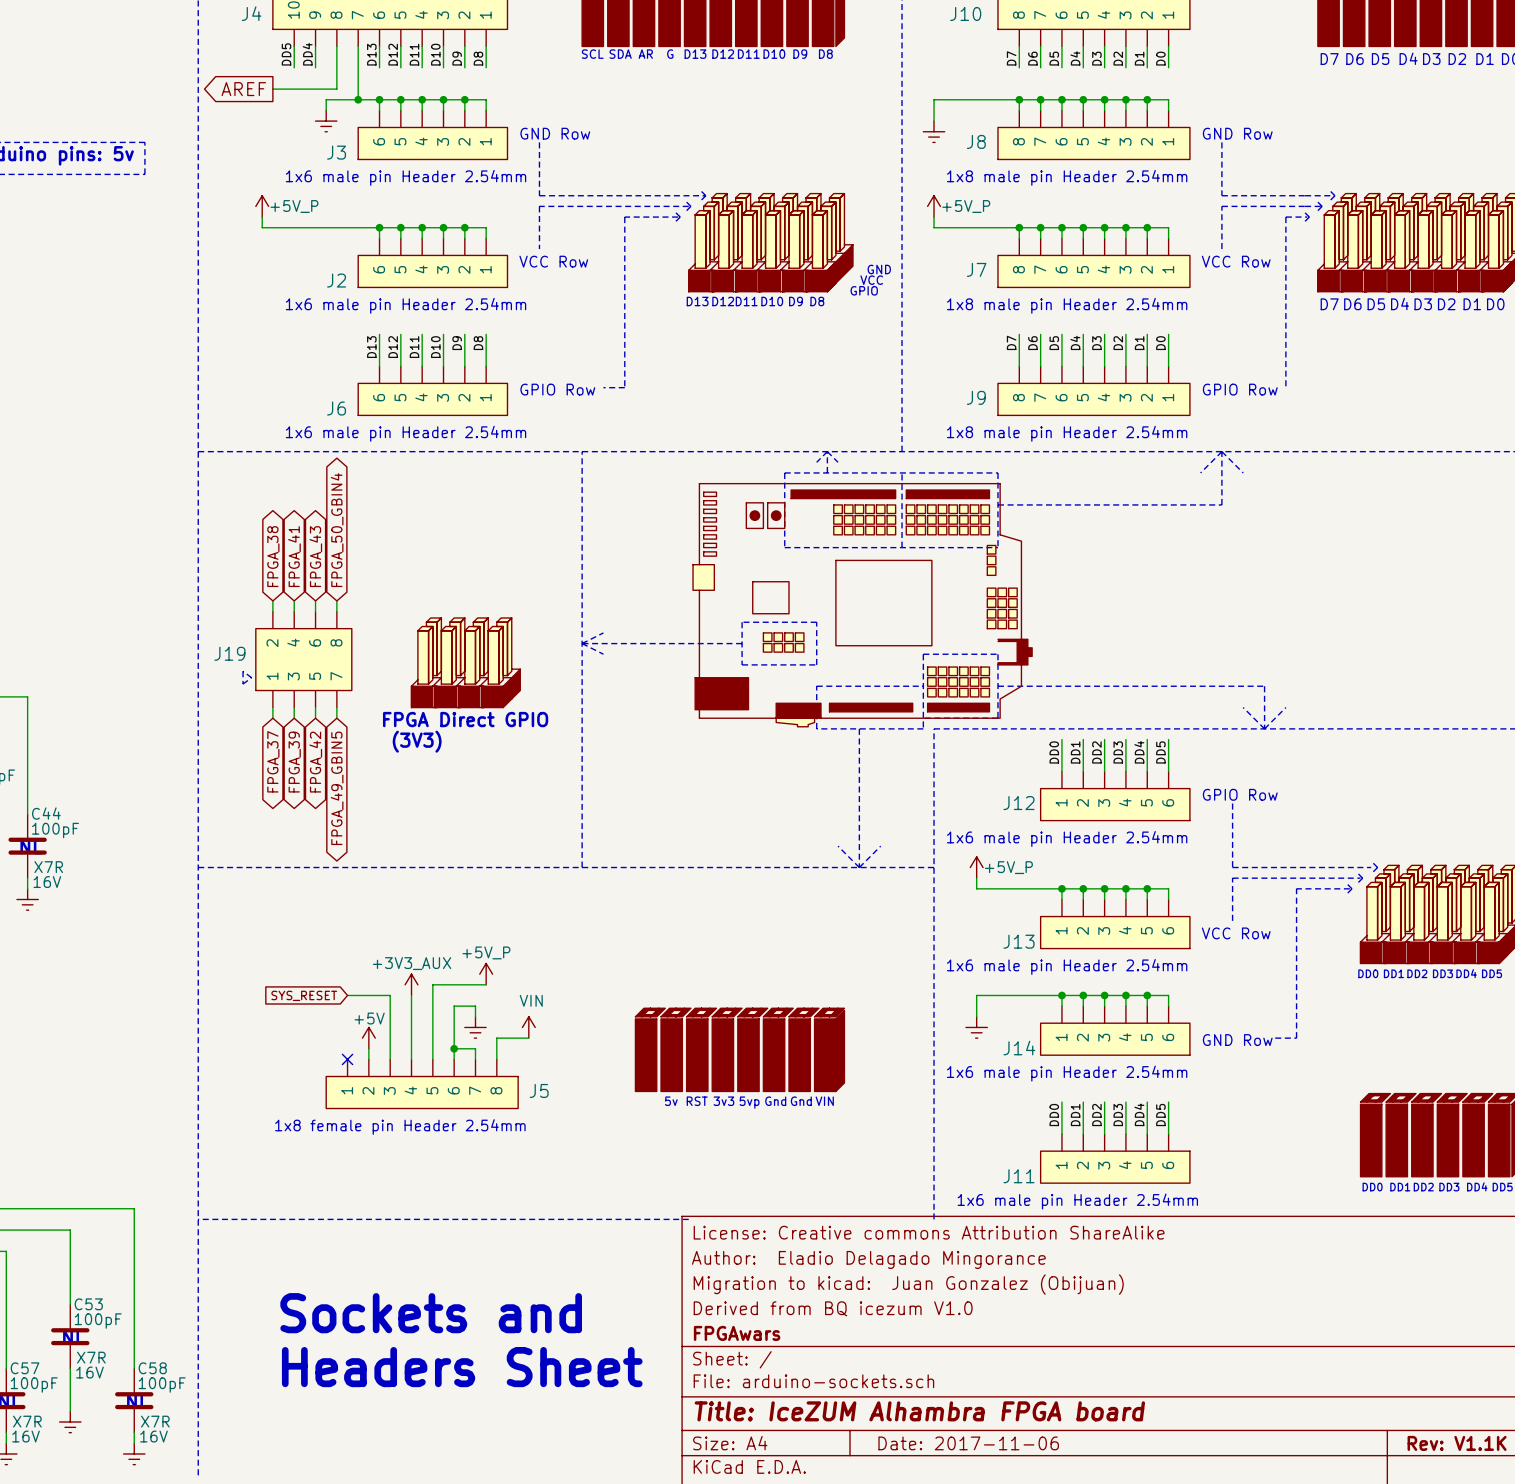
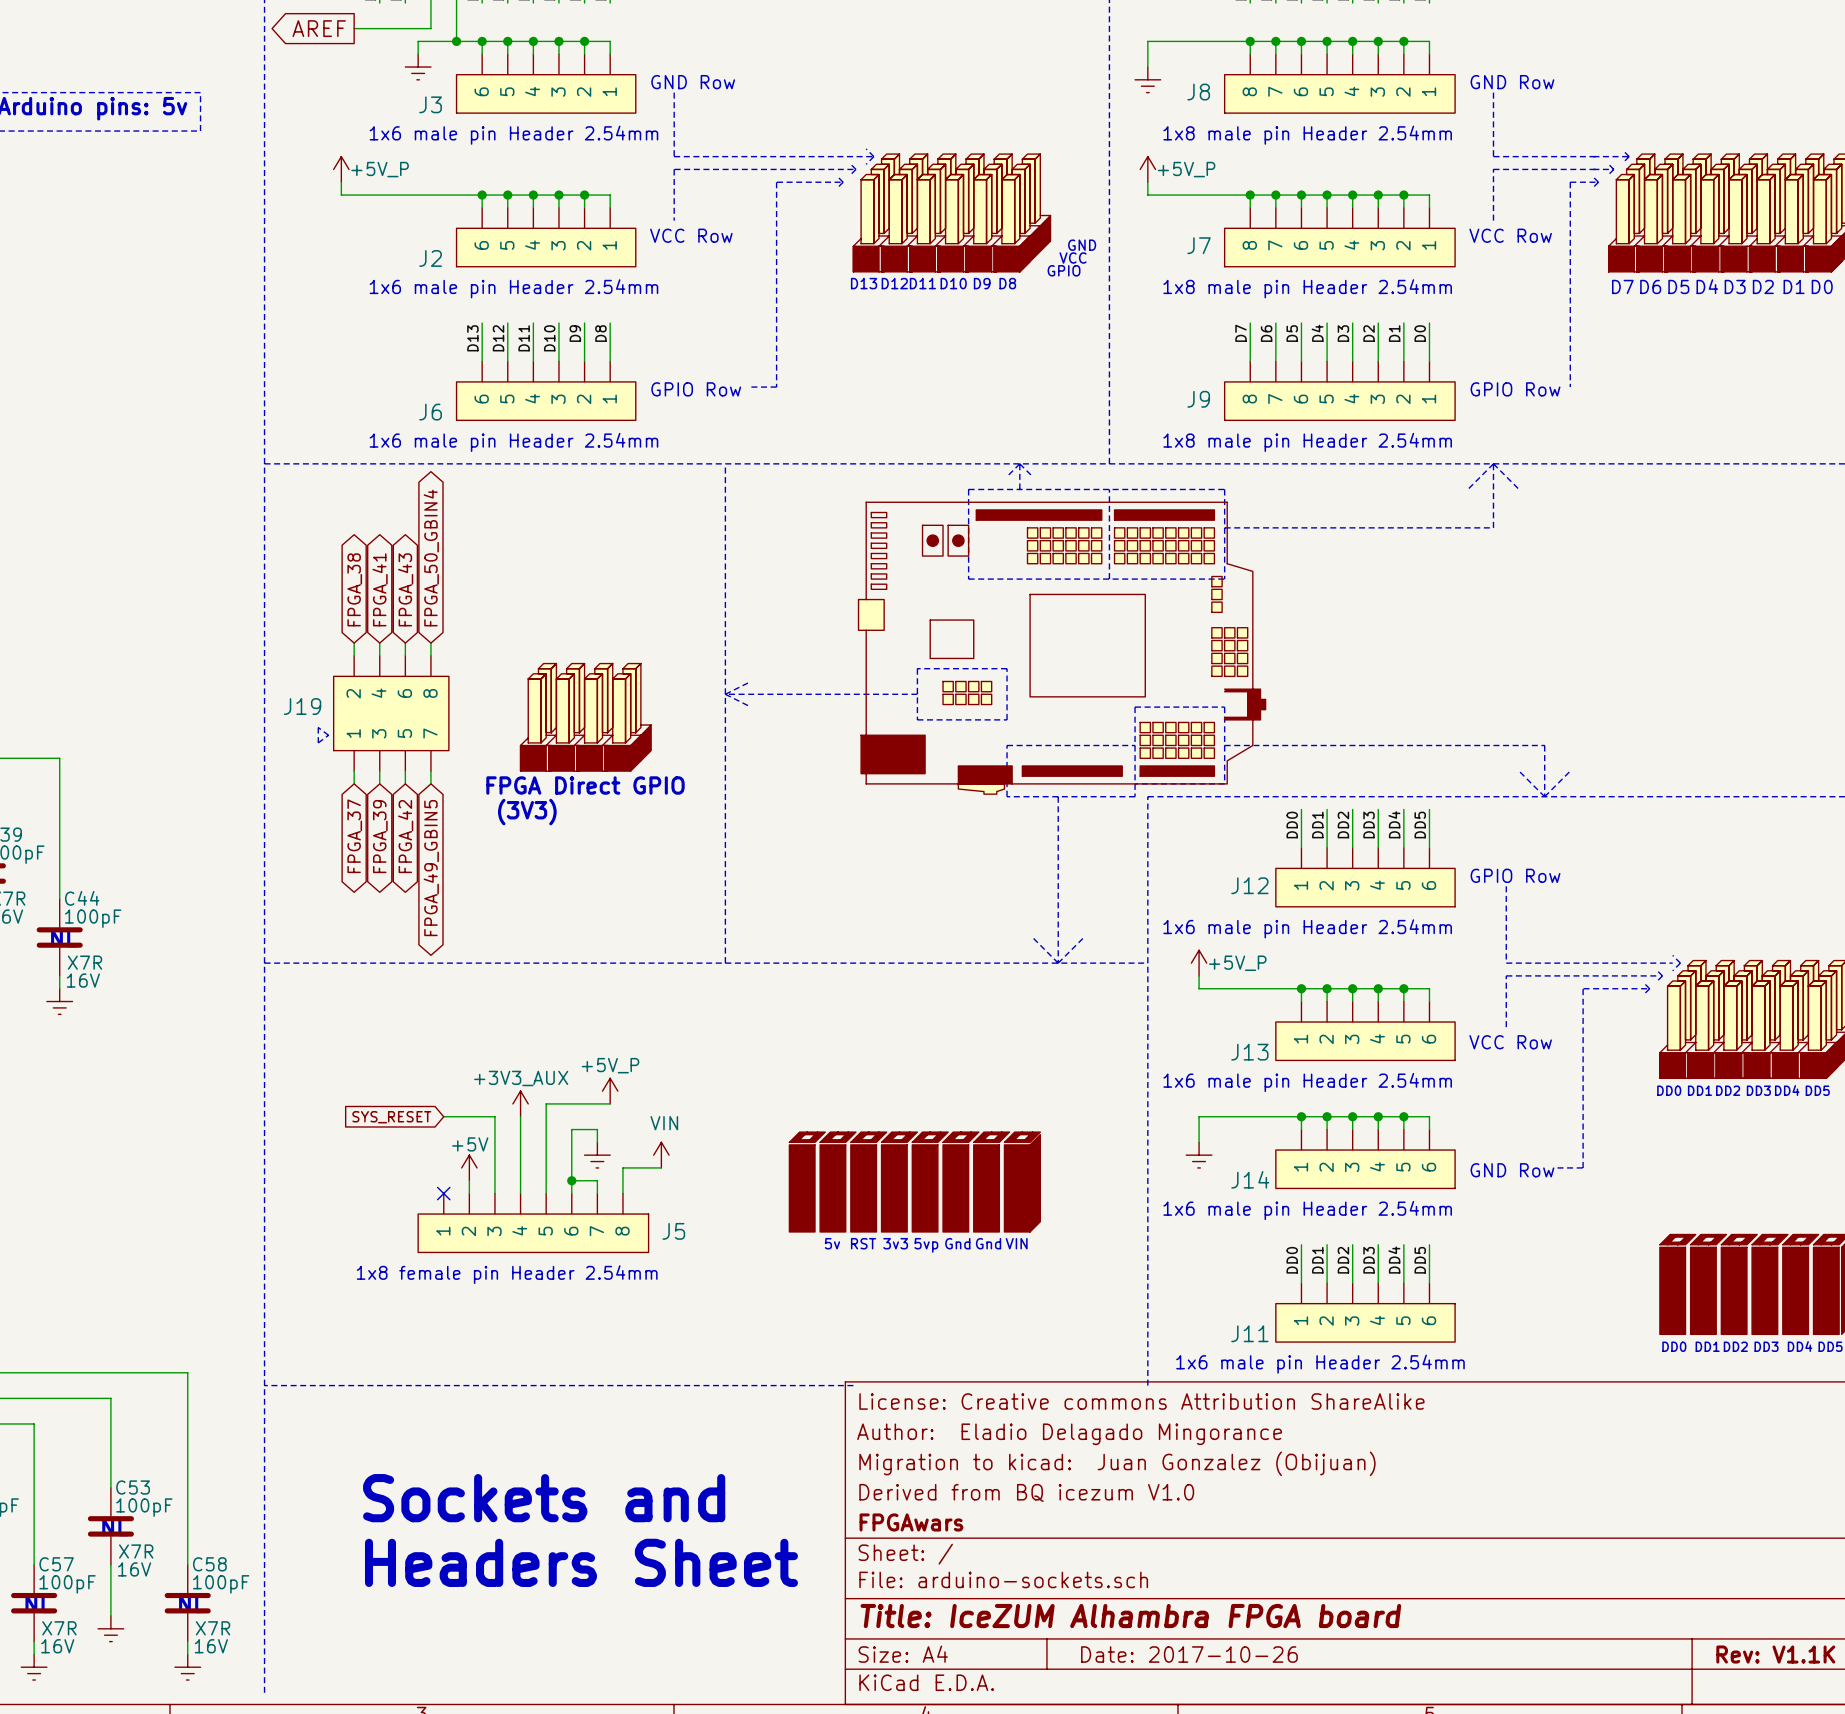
title block: Date: 2017-11-06 (968, 1443) -> Date: 2017-10-26 (1189, 1654)

